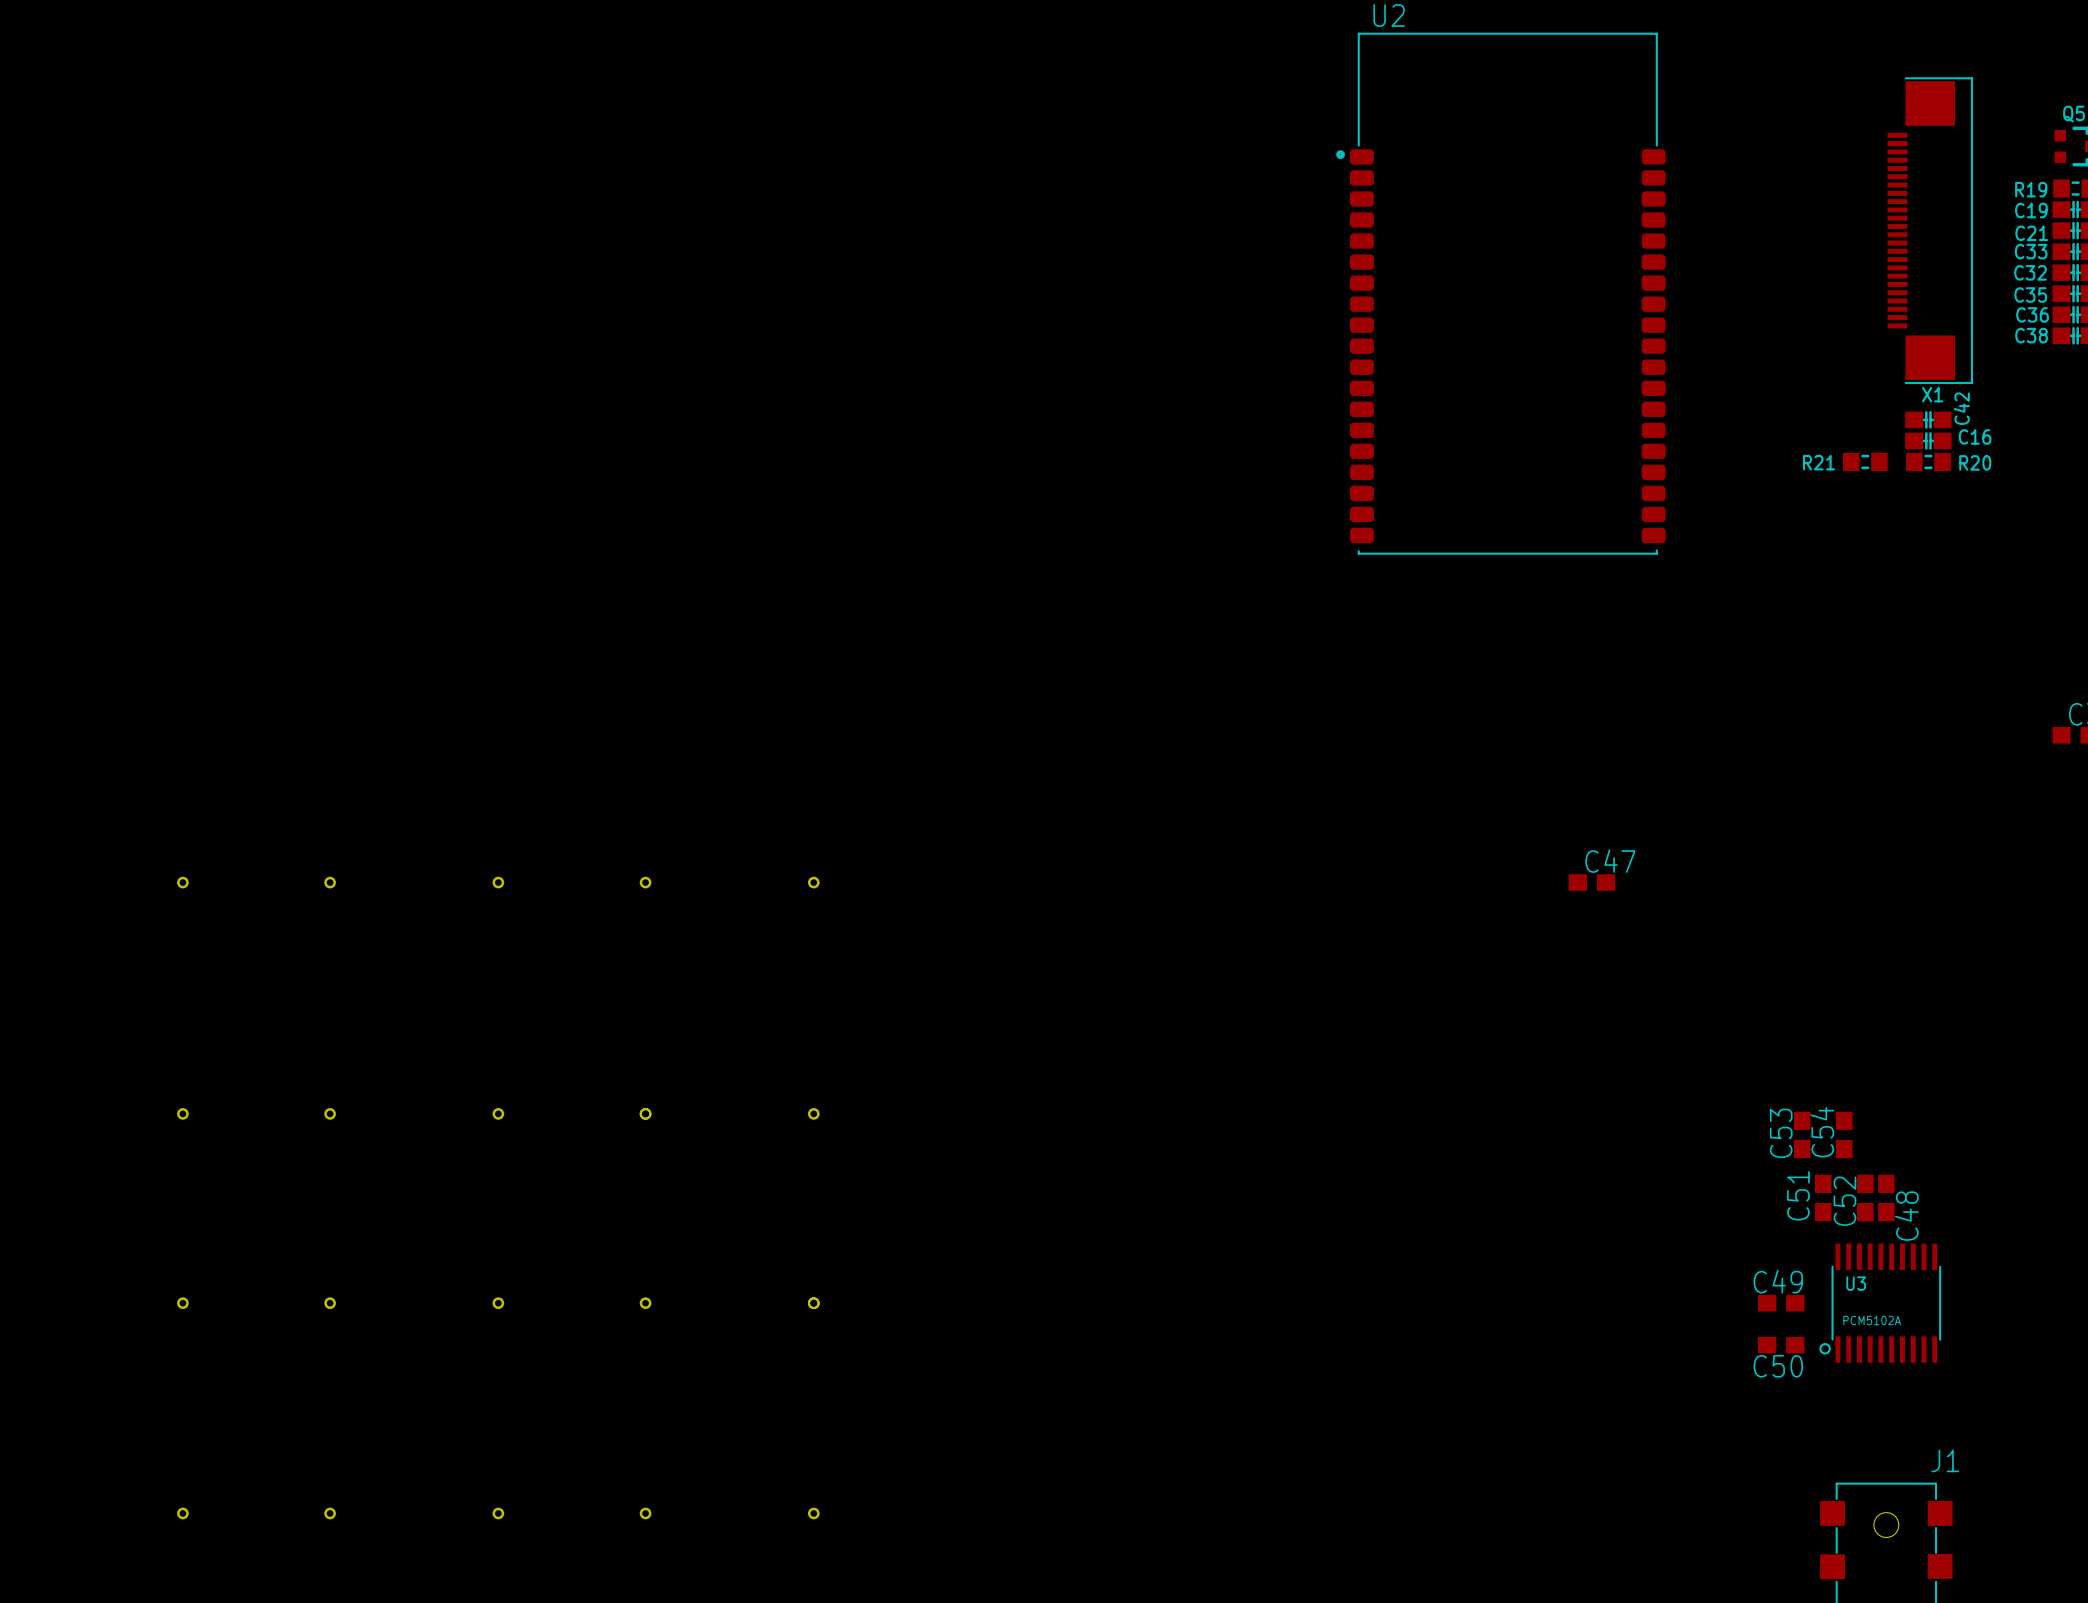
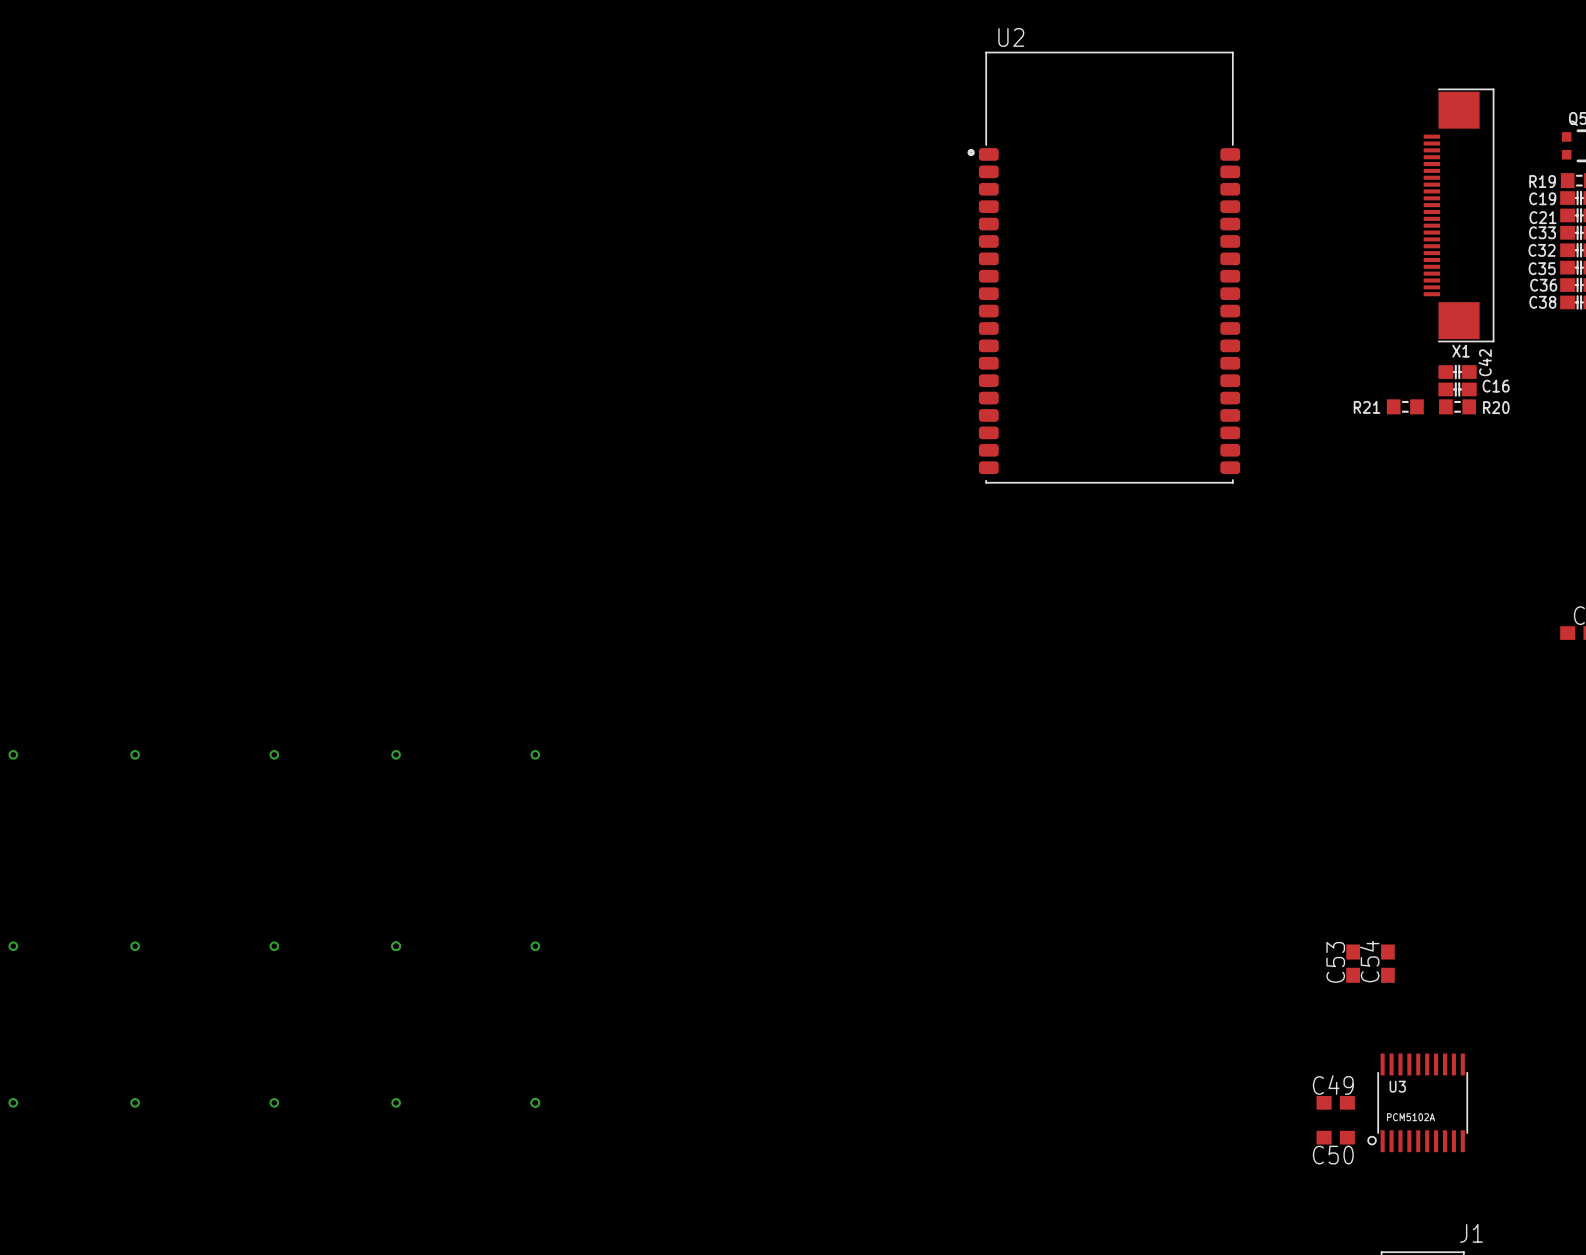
C47: (1591, 882) -> none
C51: (1823, 1198) -> none
C52: (1865, 1198) -> none
C48: (1886, 1198) -> none

